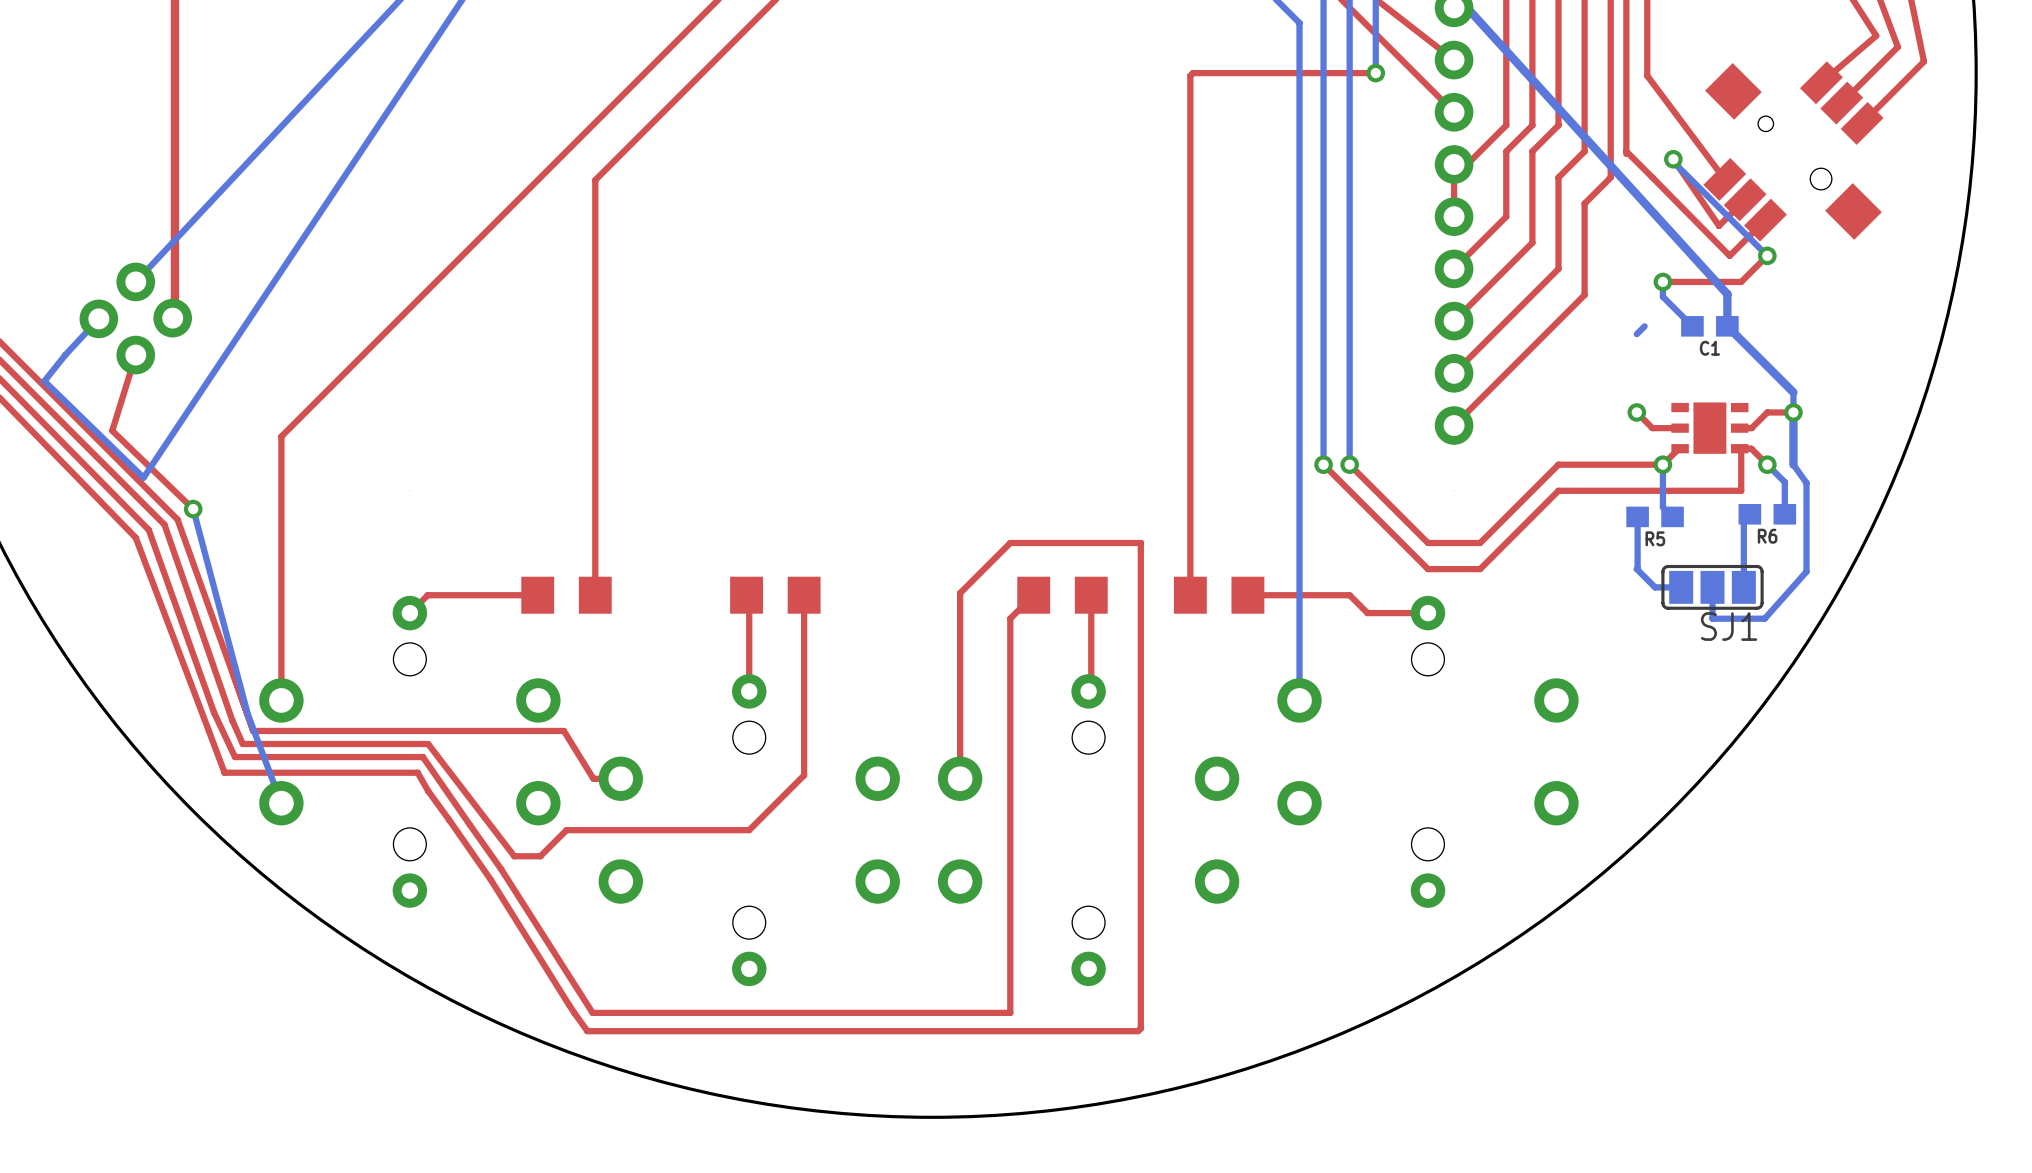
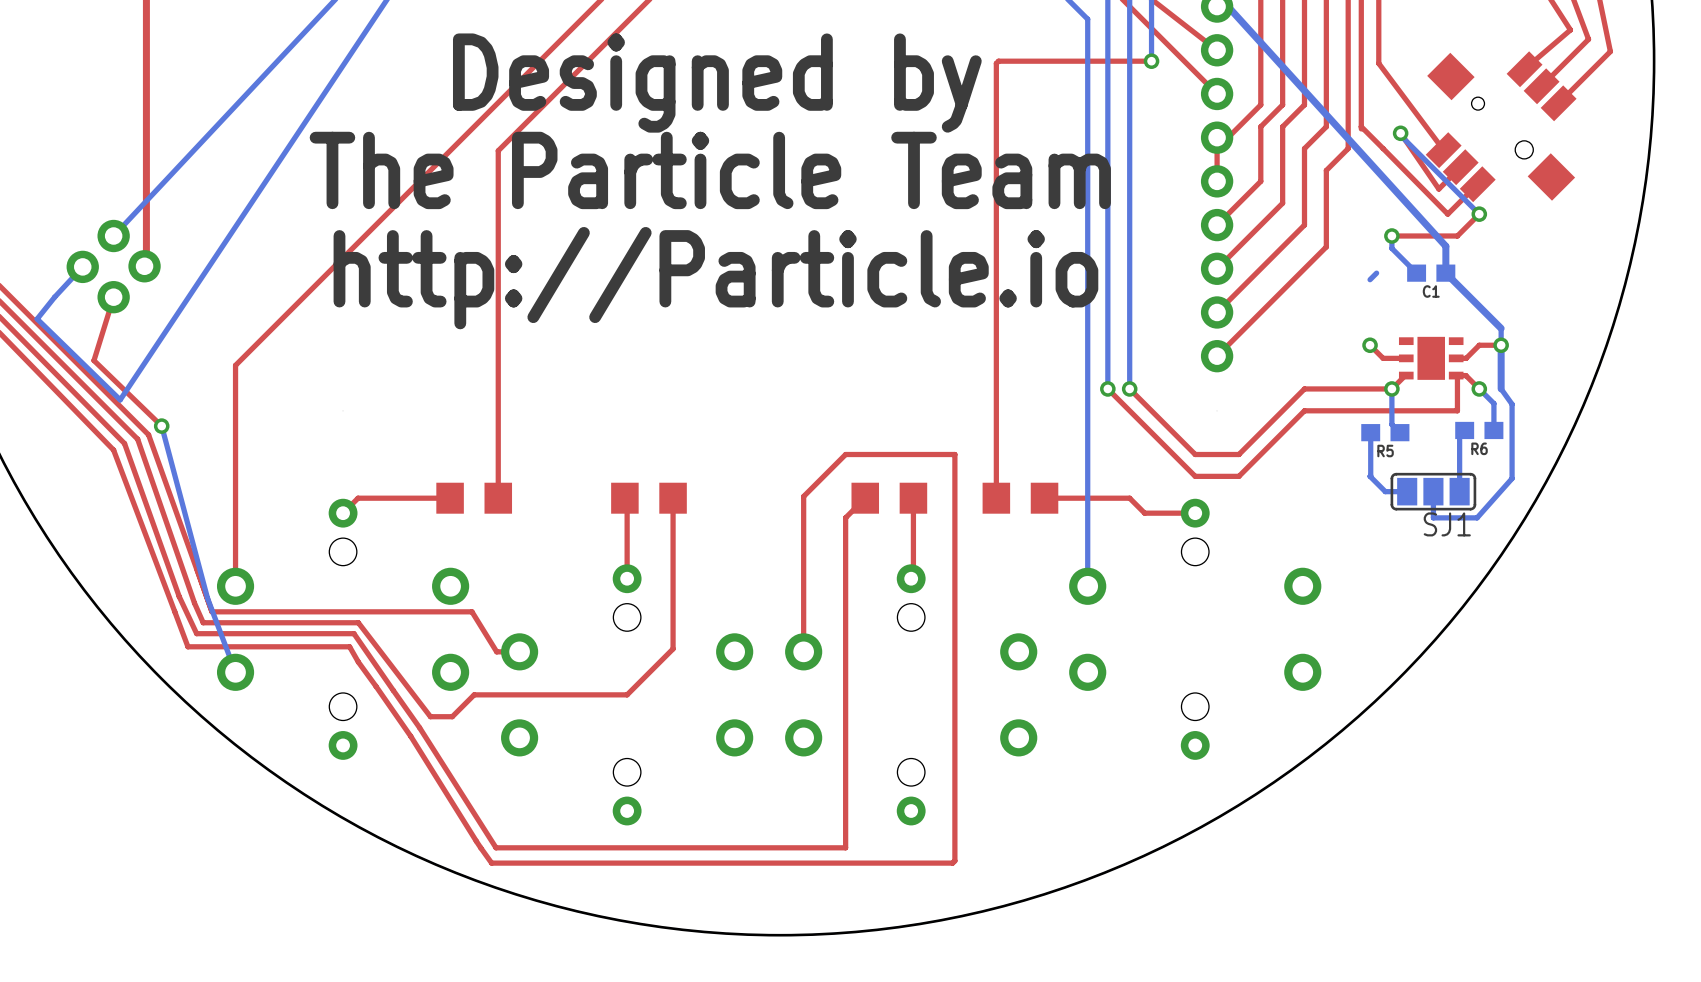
text: none -> Designed by (717, 83)
text: none -> The Particle Team (710, 170)
text: none -> http://Particle.io (715, 278)

